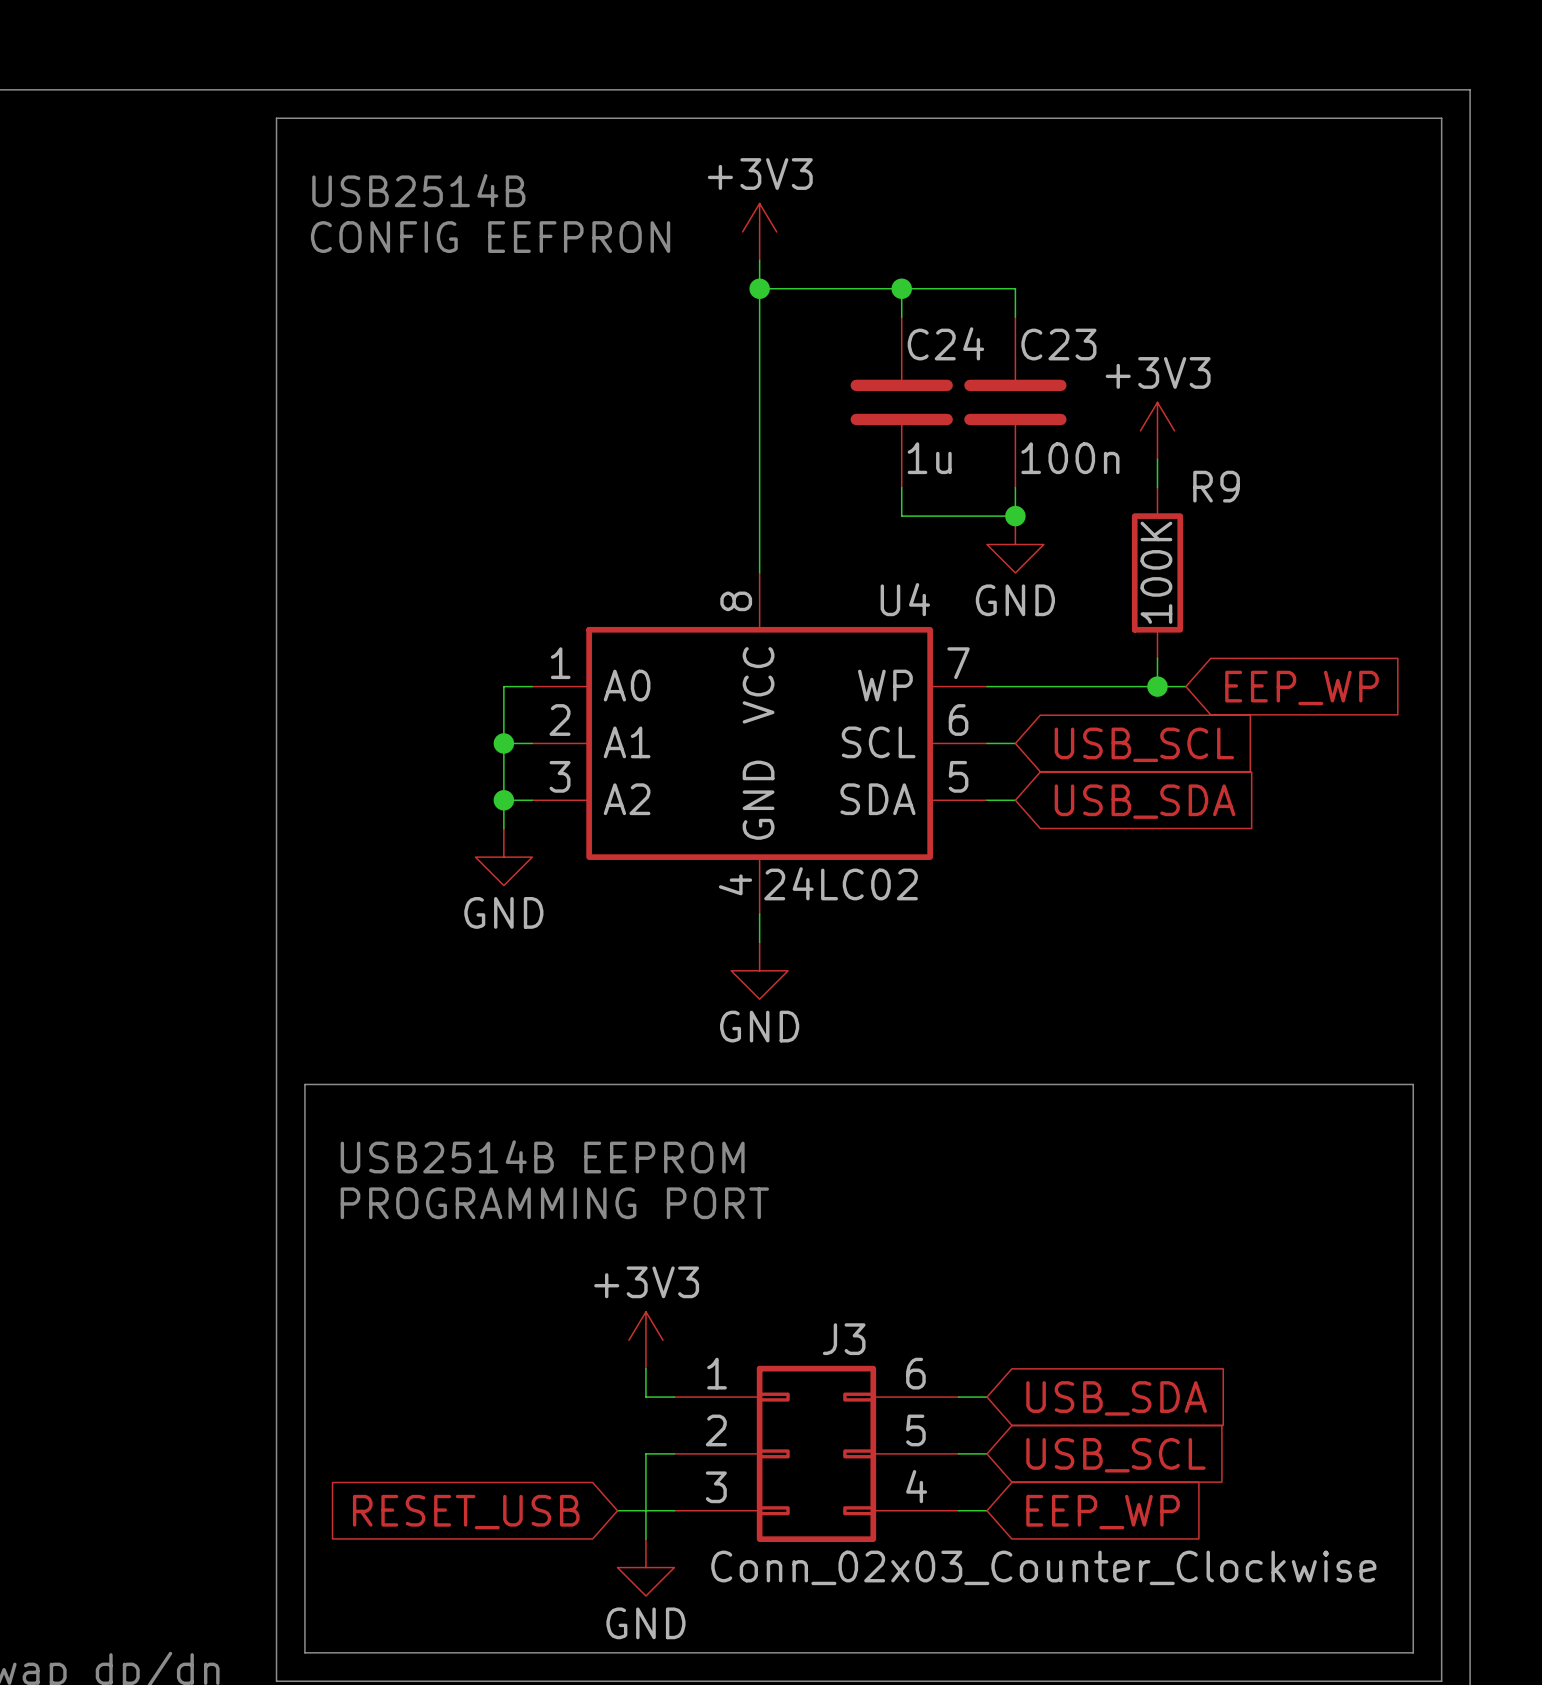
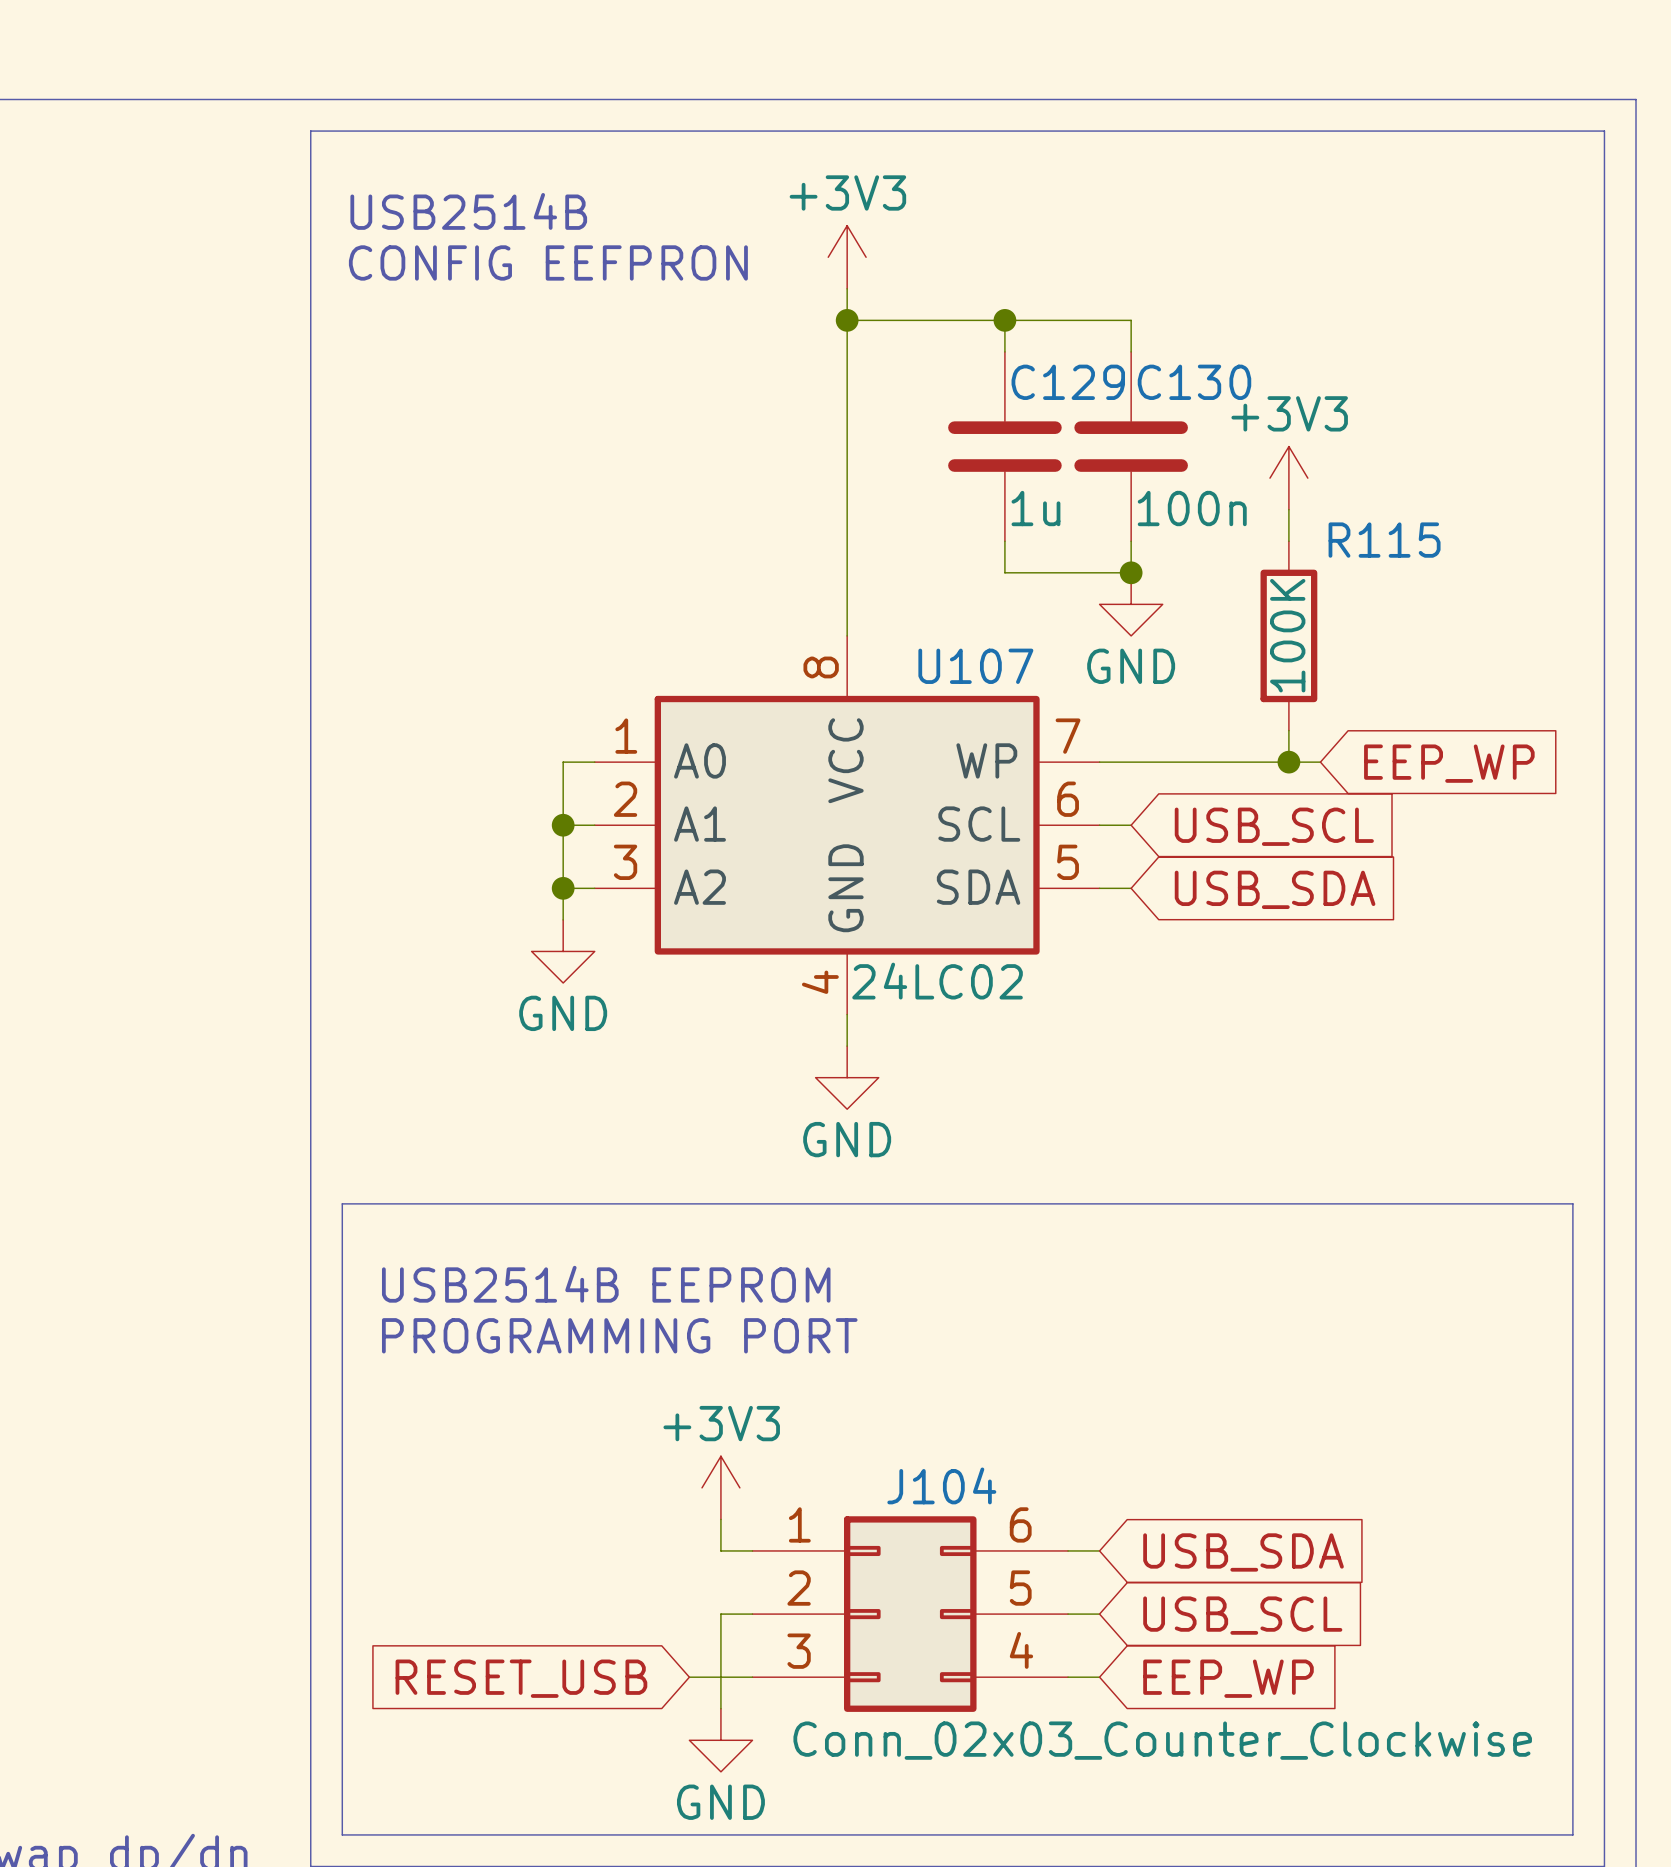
C24 name: C24 (945, 343) -> C129 (1068, 382)
C23 name: C23 (1058, 344) -> C130 (1194, 382)
R9 name: R9 (1216, 486) -> R115 (1384, 540)
U4 name: U4 (905, 599) -> U107 (975, 666)
J3 name: J3 (844, 1339) -> J104 (941, 1485)

